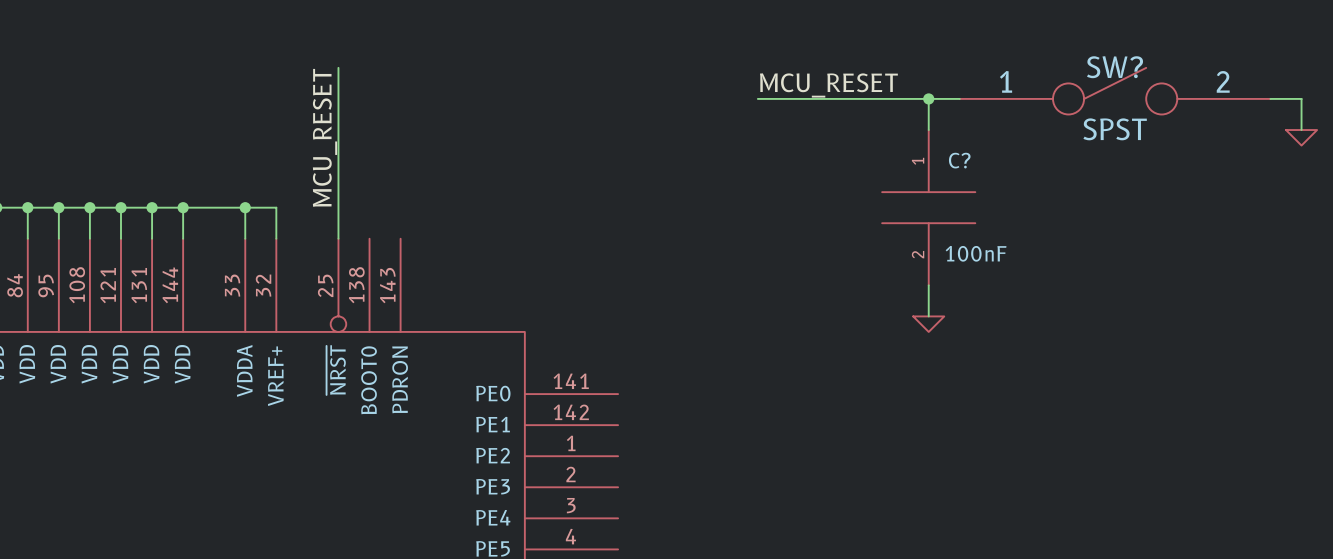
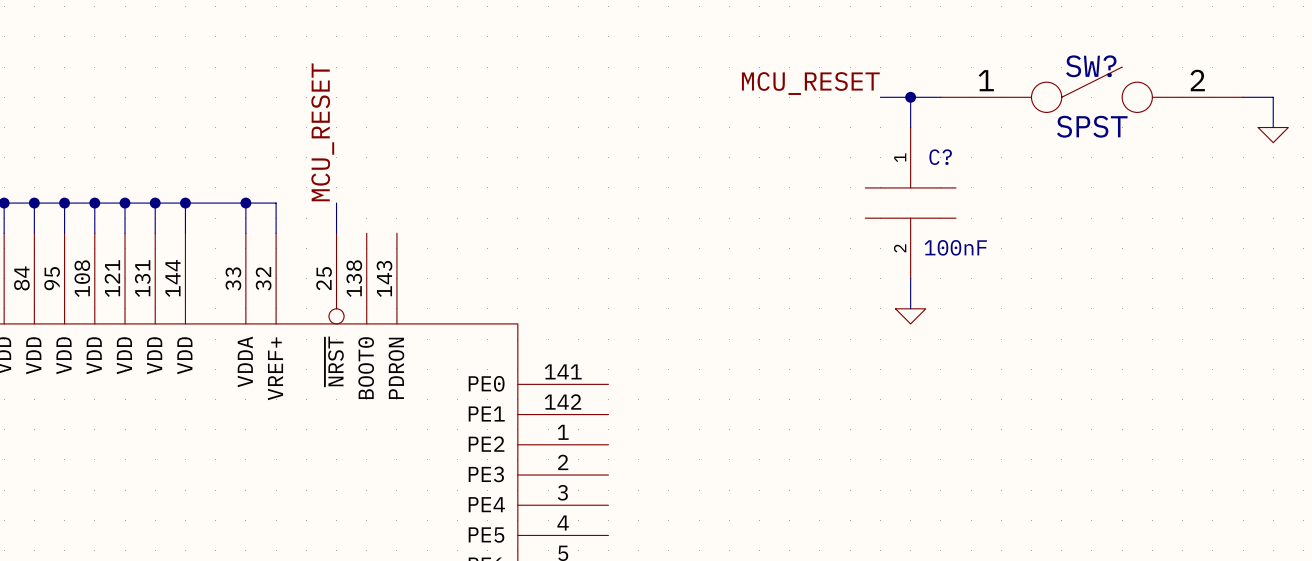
wire: (338, 67) (338, 207) -> none
label position: MCU_RESET (828, 85) -> MCU_RESET (810, 83)
wire: (757, 98) (897, 98) -> none
label position: MCU_RESET (324, 137) -> MCU_RESET (322, 132)

